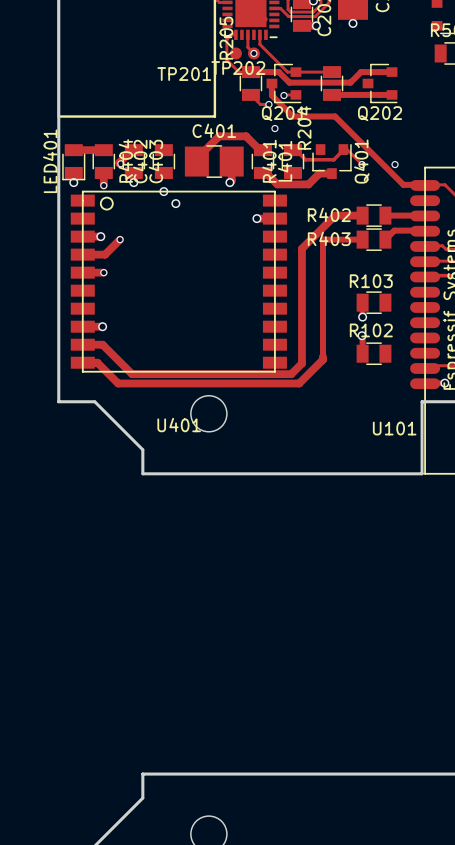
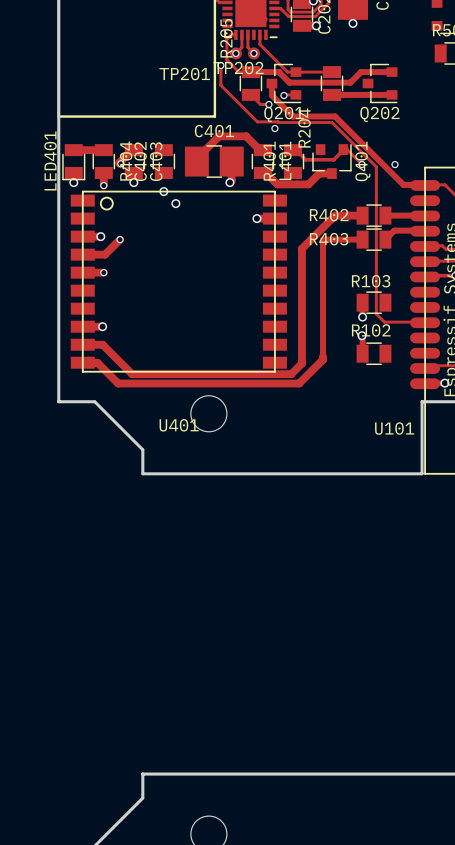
track: none -> (241, 34) (241, 47) (235, 53)
via: none -> (235, 53)
track: none -> (220, 65) (220, 85) (257, 121) (332, 122) (376, 166) (376, 314) (384, 322) (424, 322)
via: none -> (220, 65)

